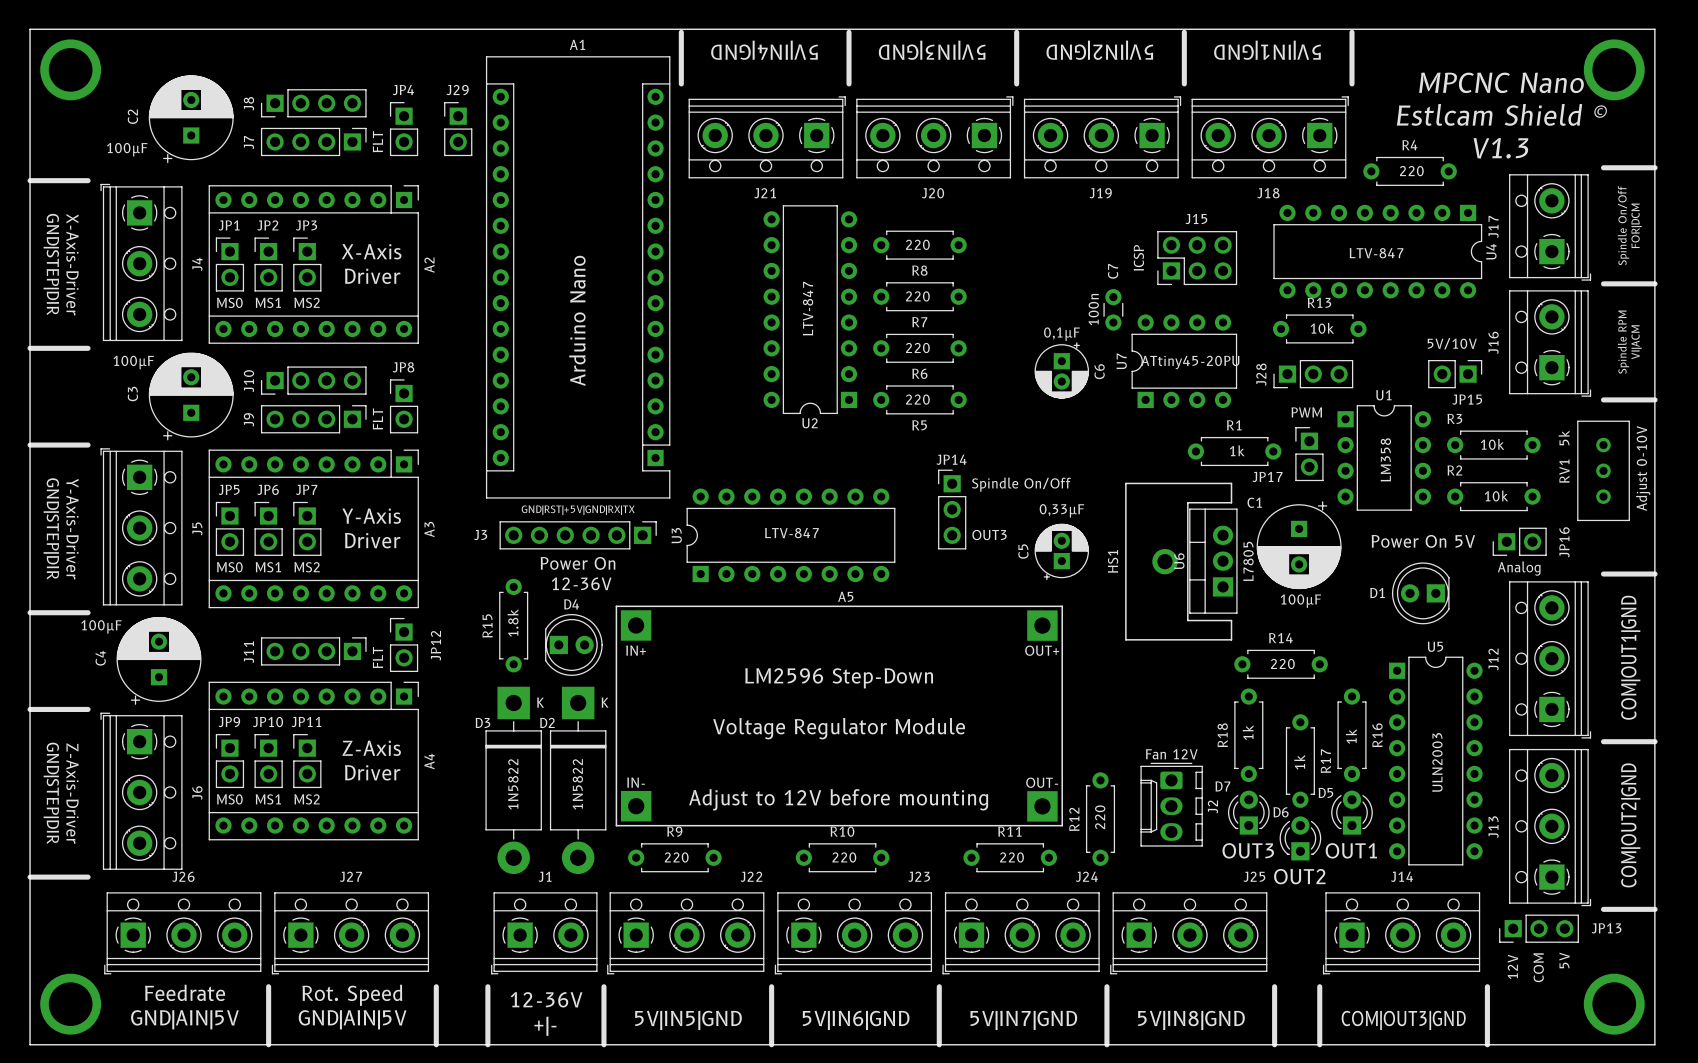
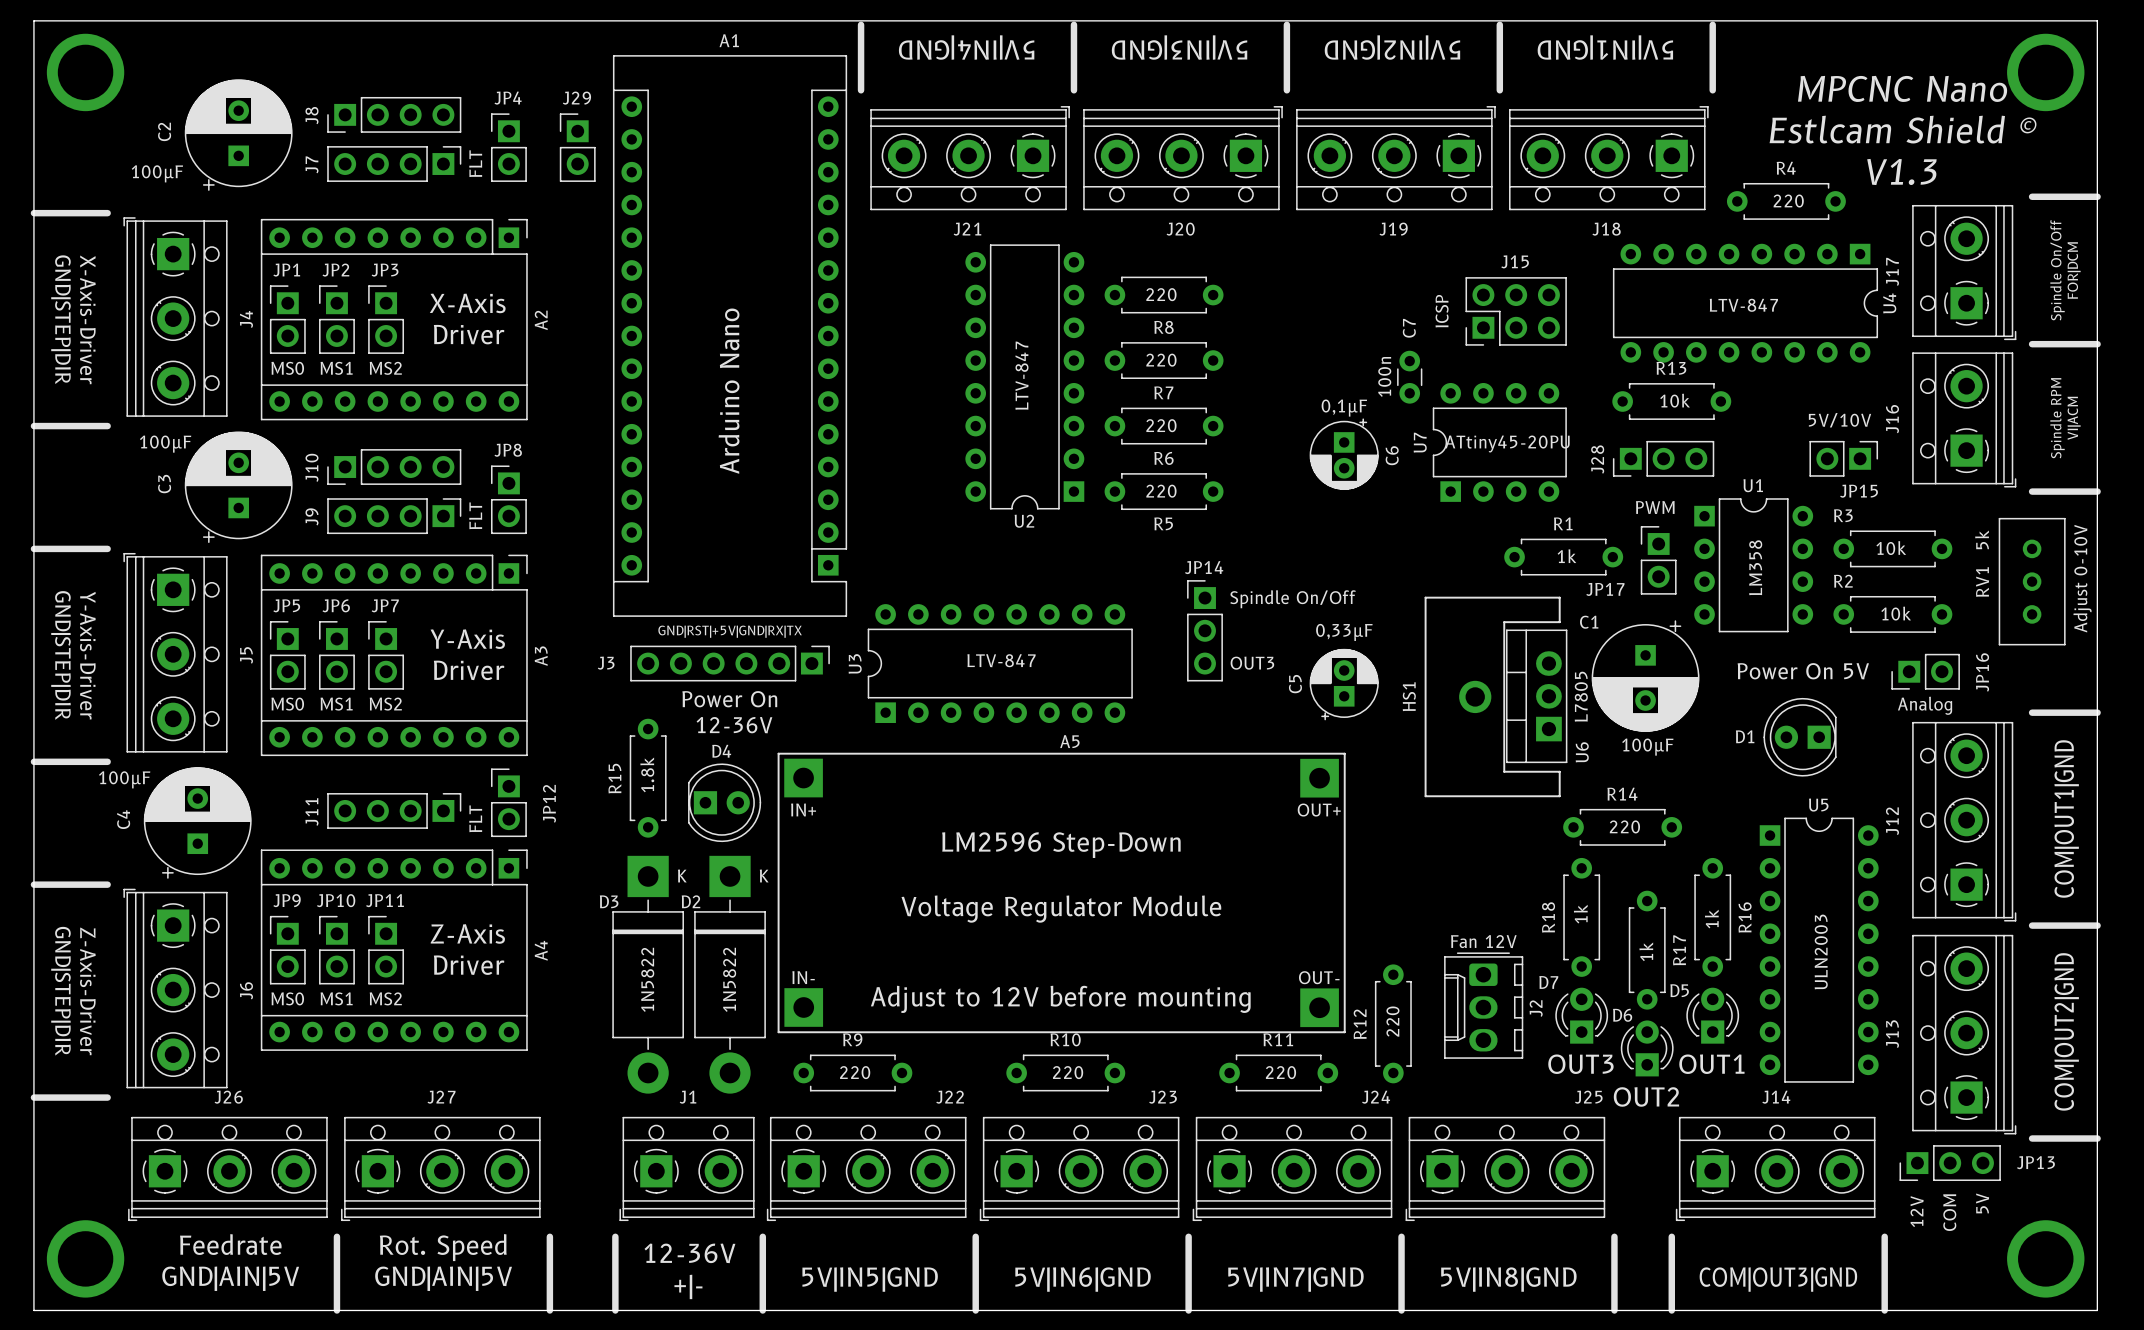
U6 name position: U6 (1179, 561) -> U6 (1582, 752)

